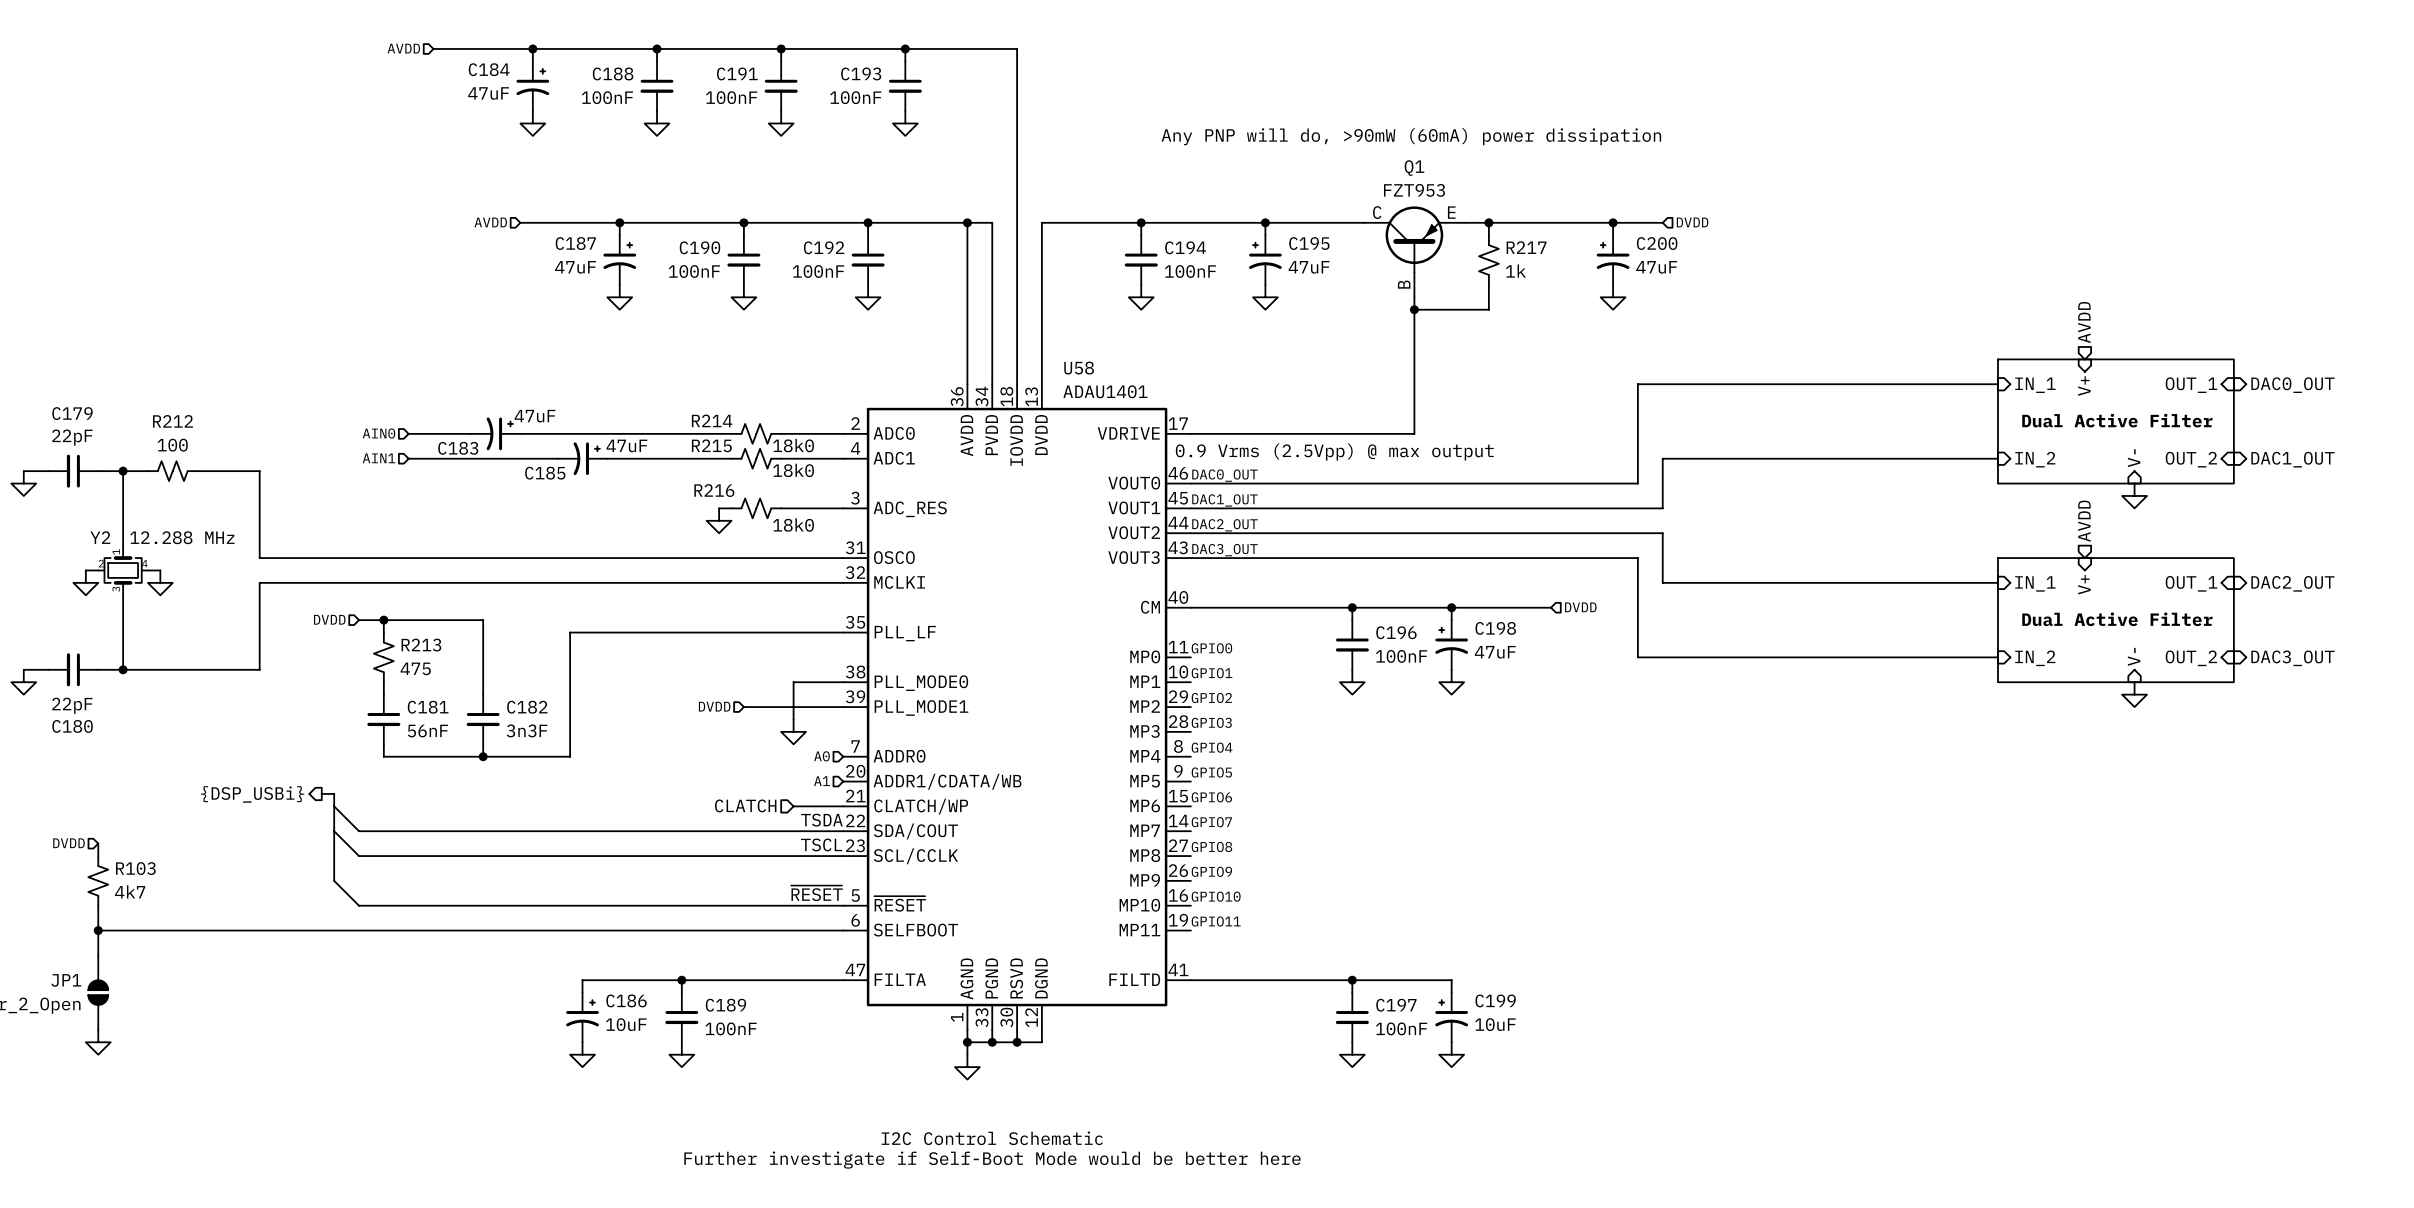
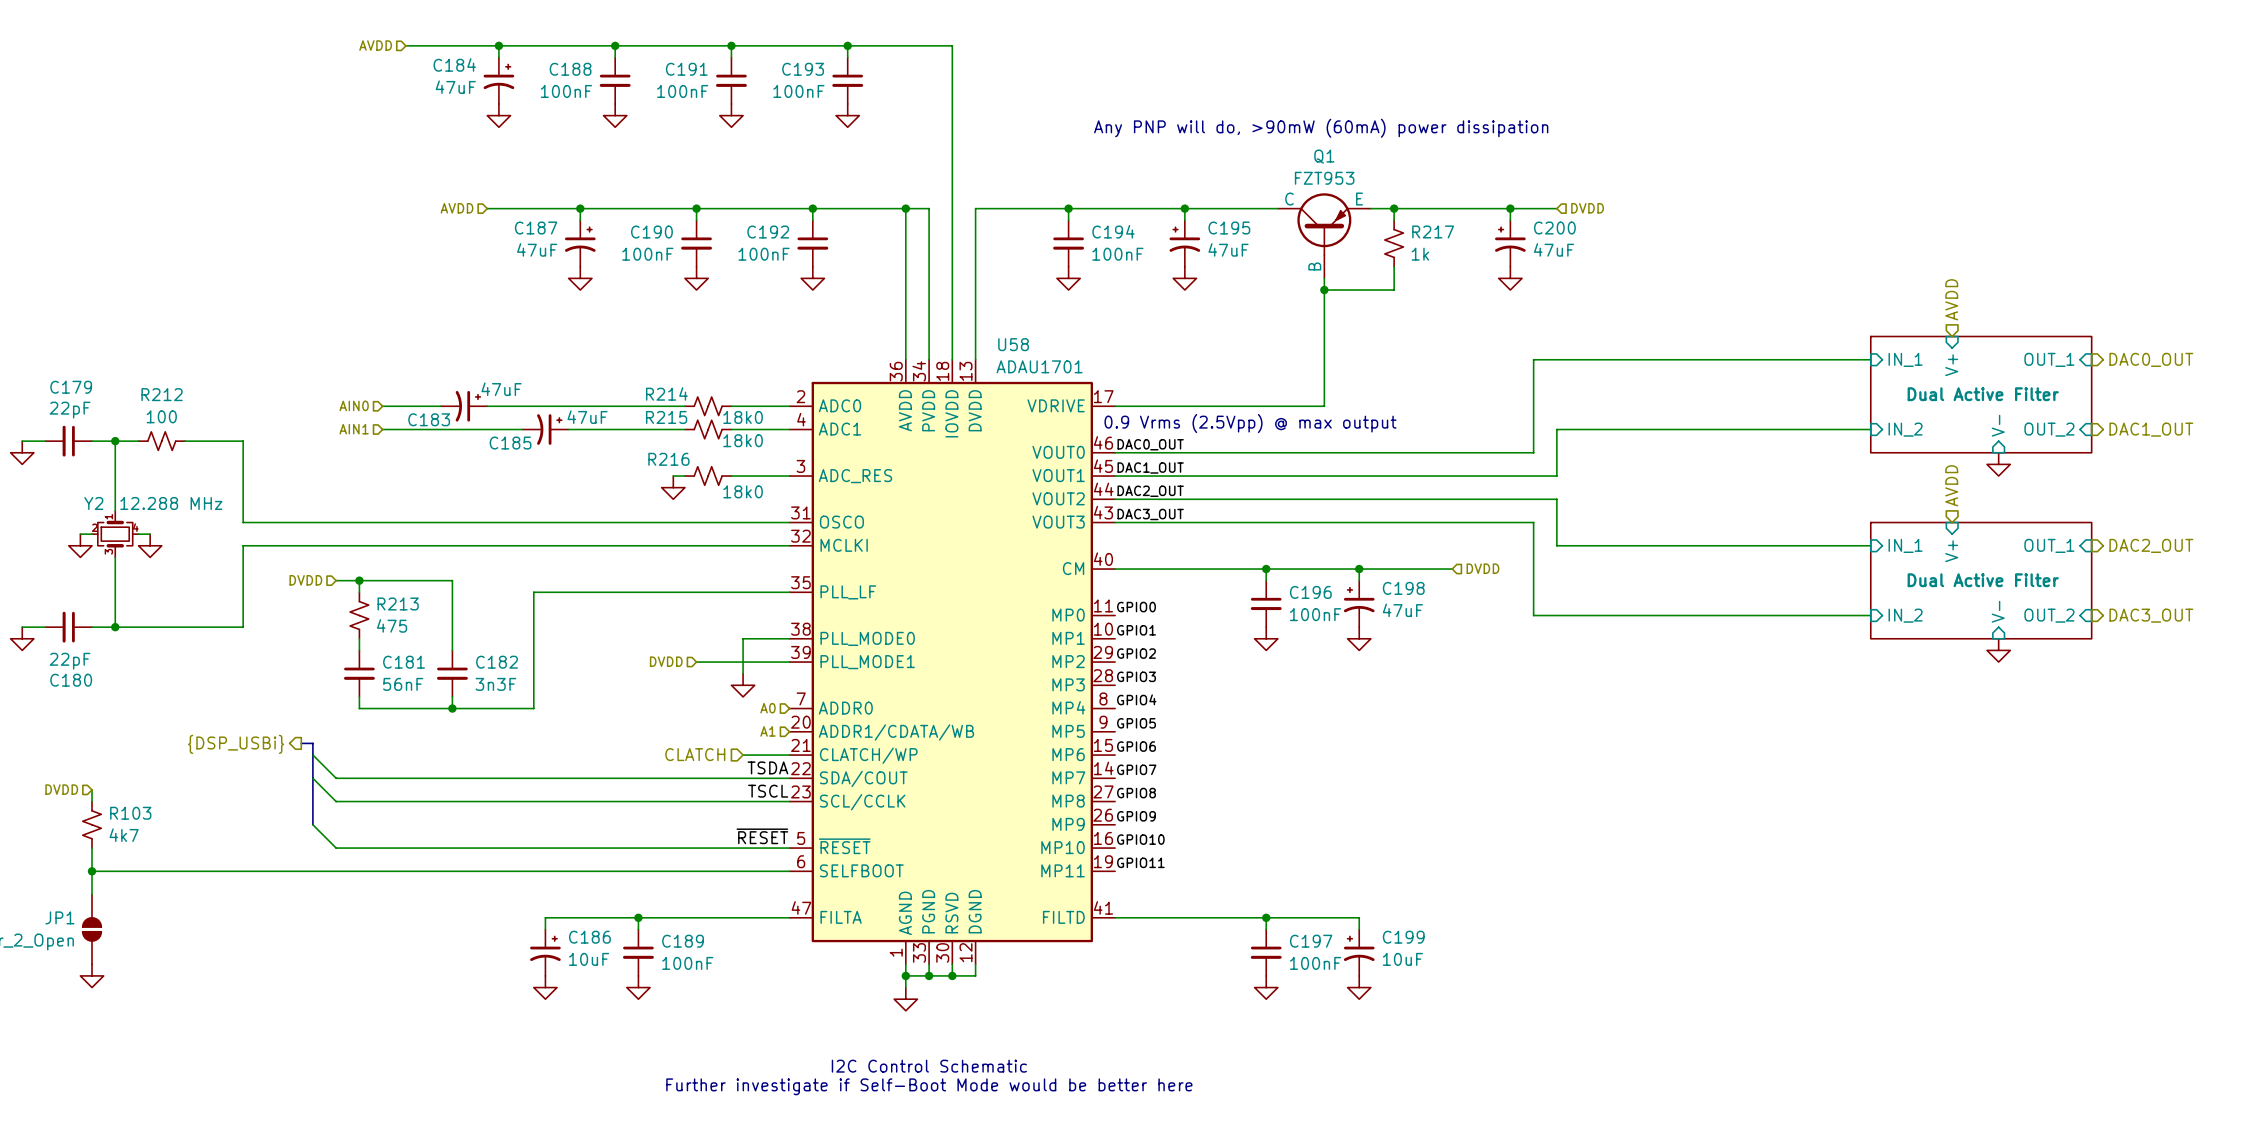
U58 value: ADAU1401 (1105, 391) -> ADAU1701 (1039, 366)

